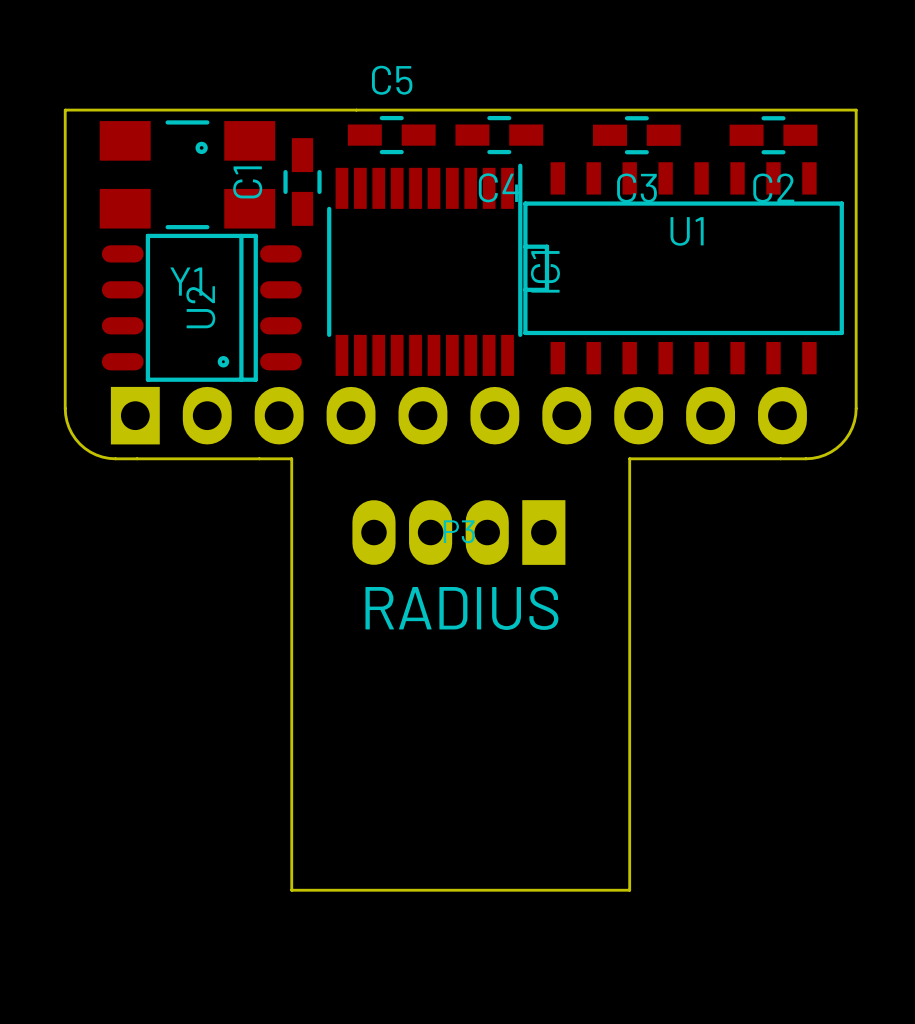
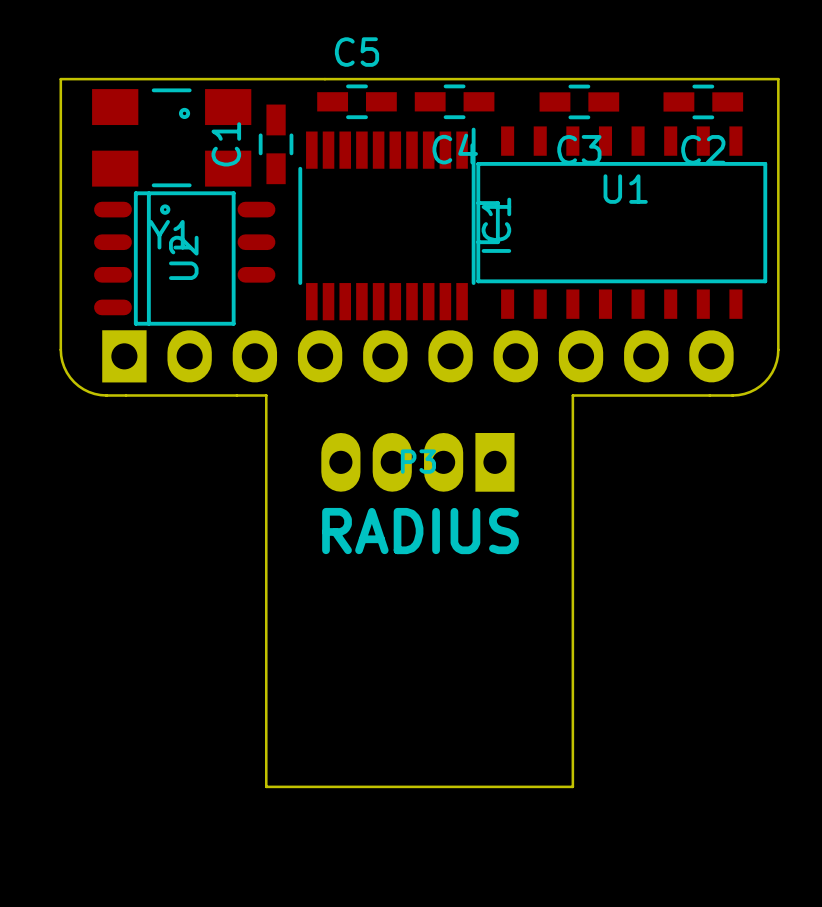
U2 footprint: [101, 233, 302, 382] -> [94, 191, 276, 326]

